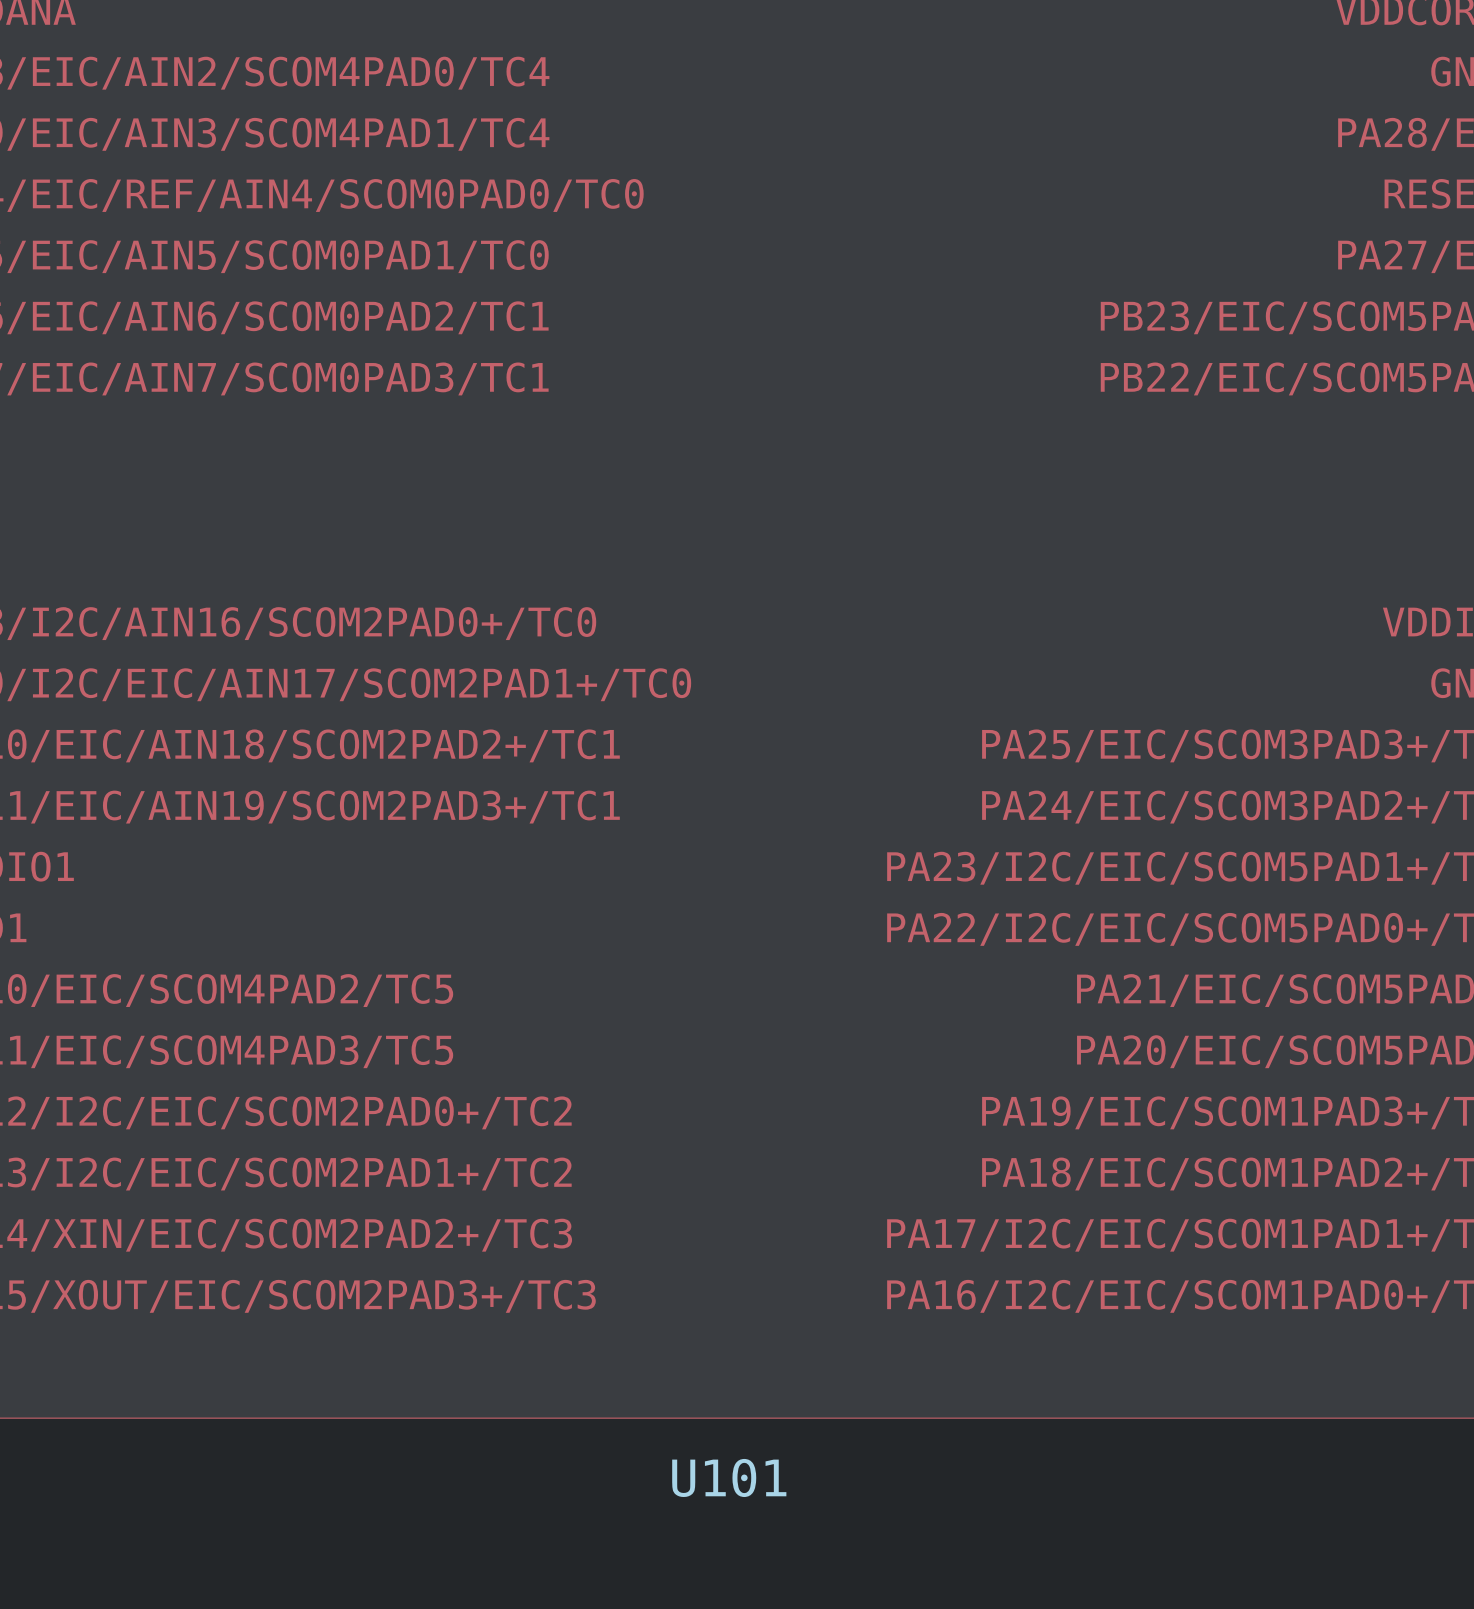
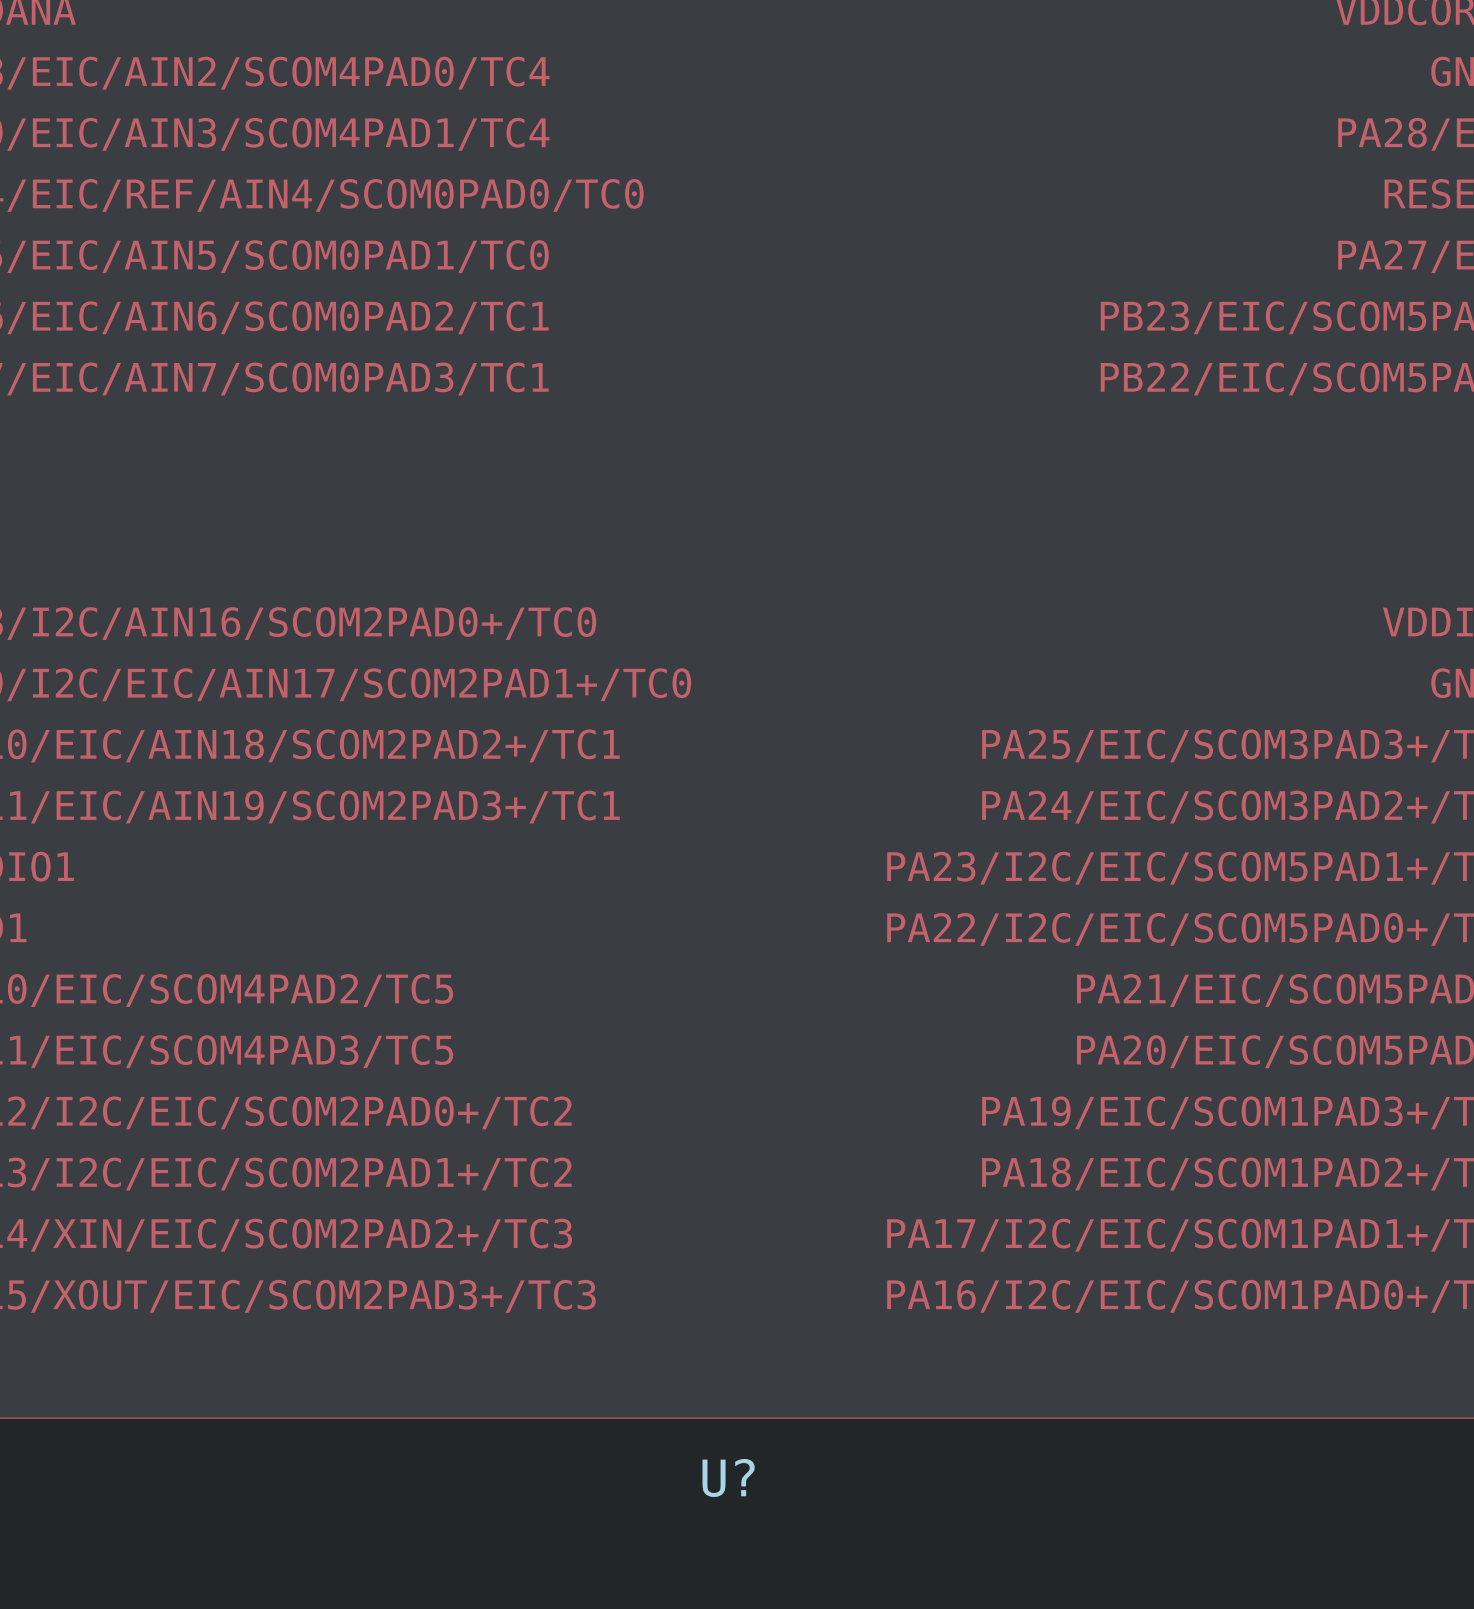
U101 name: U101 (729, 1477) -> U? (728, 1477)

